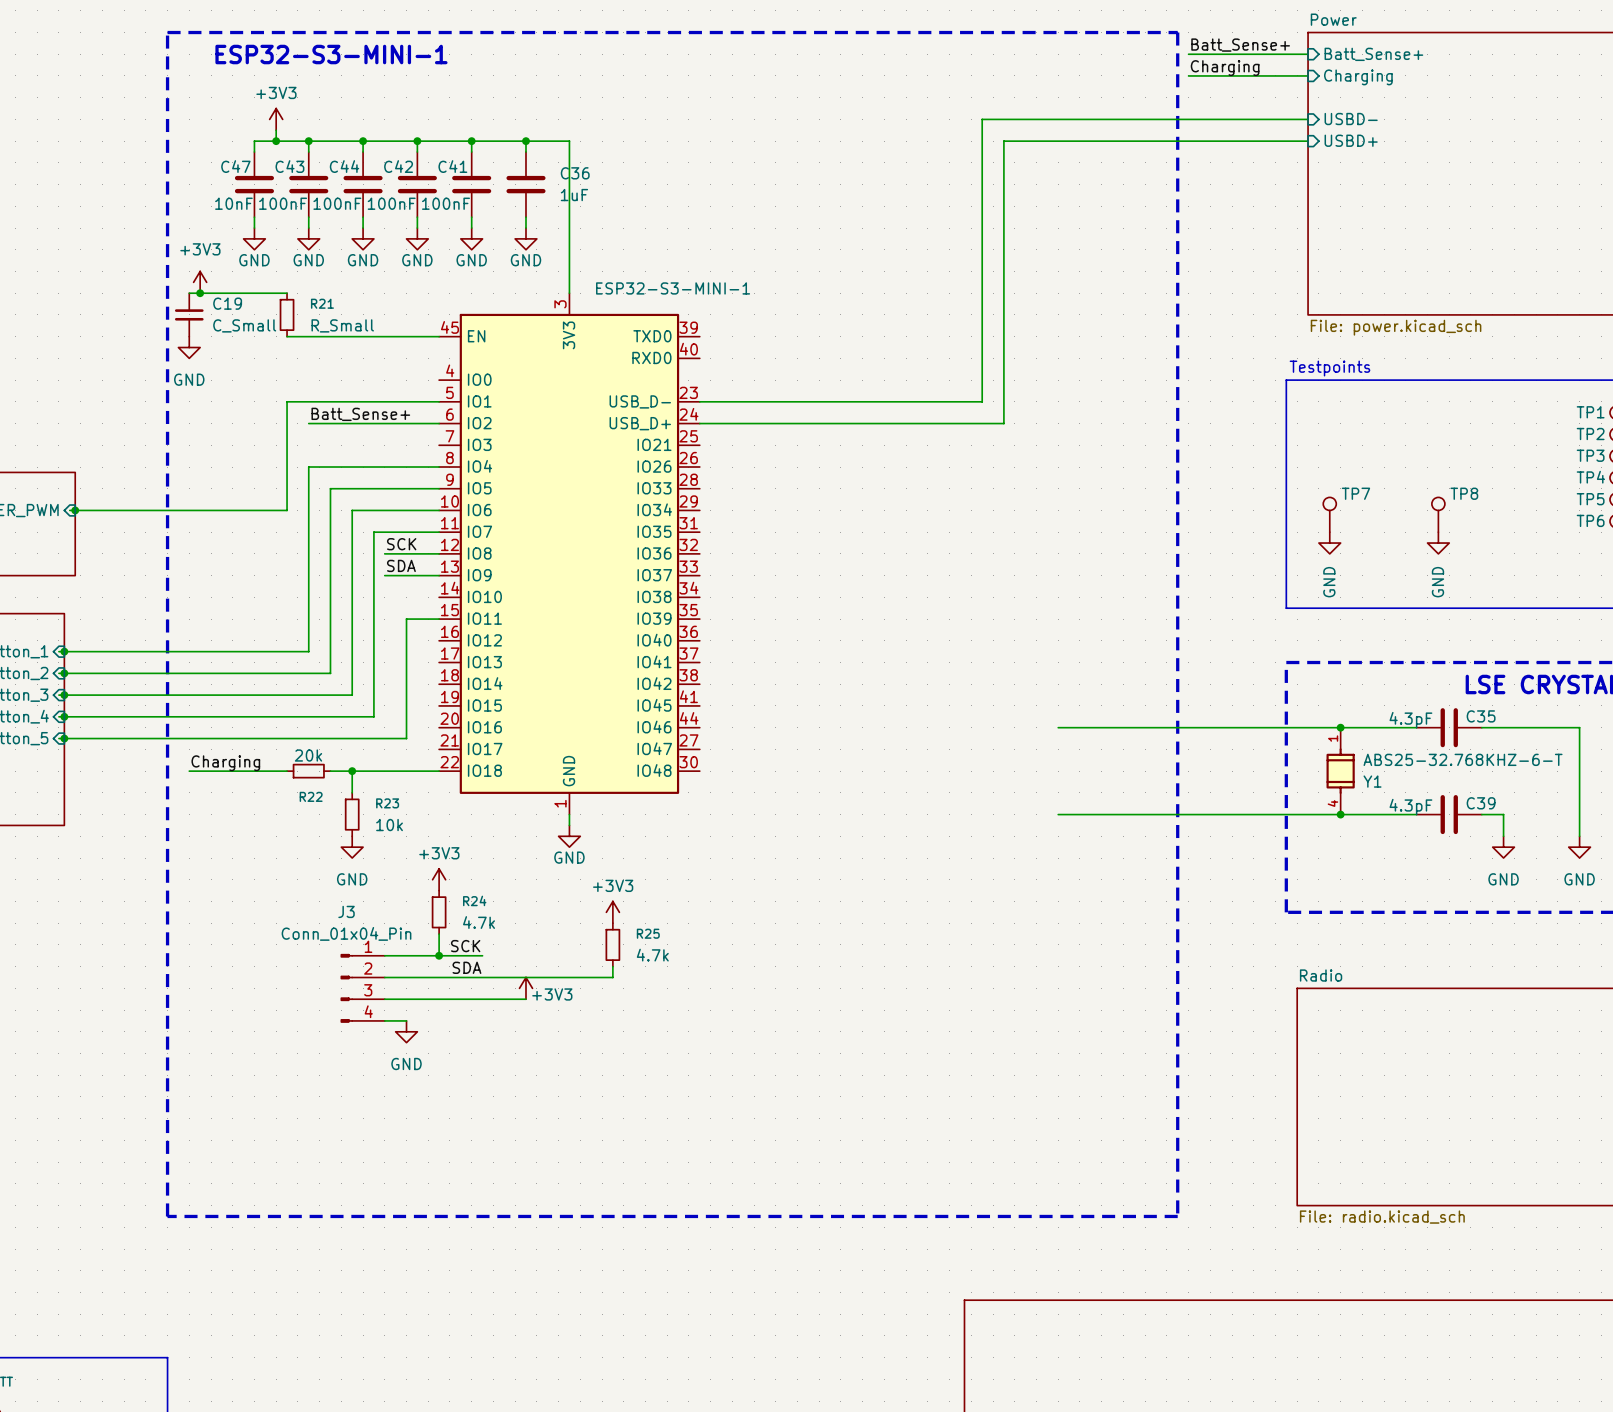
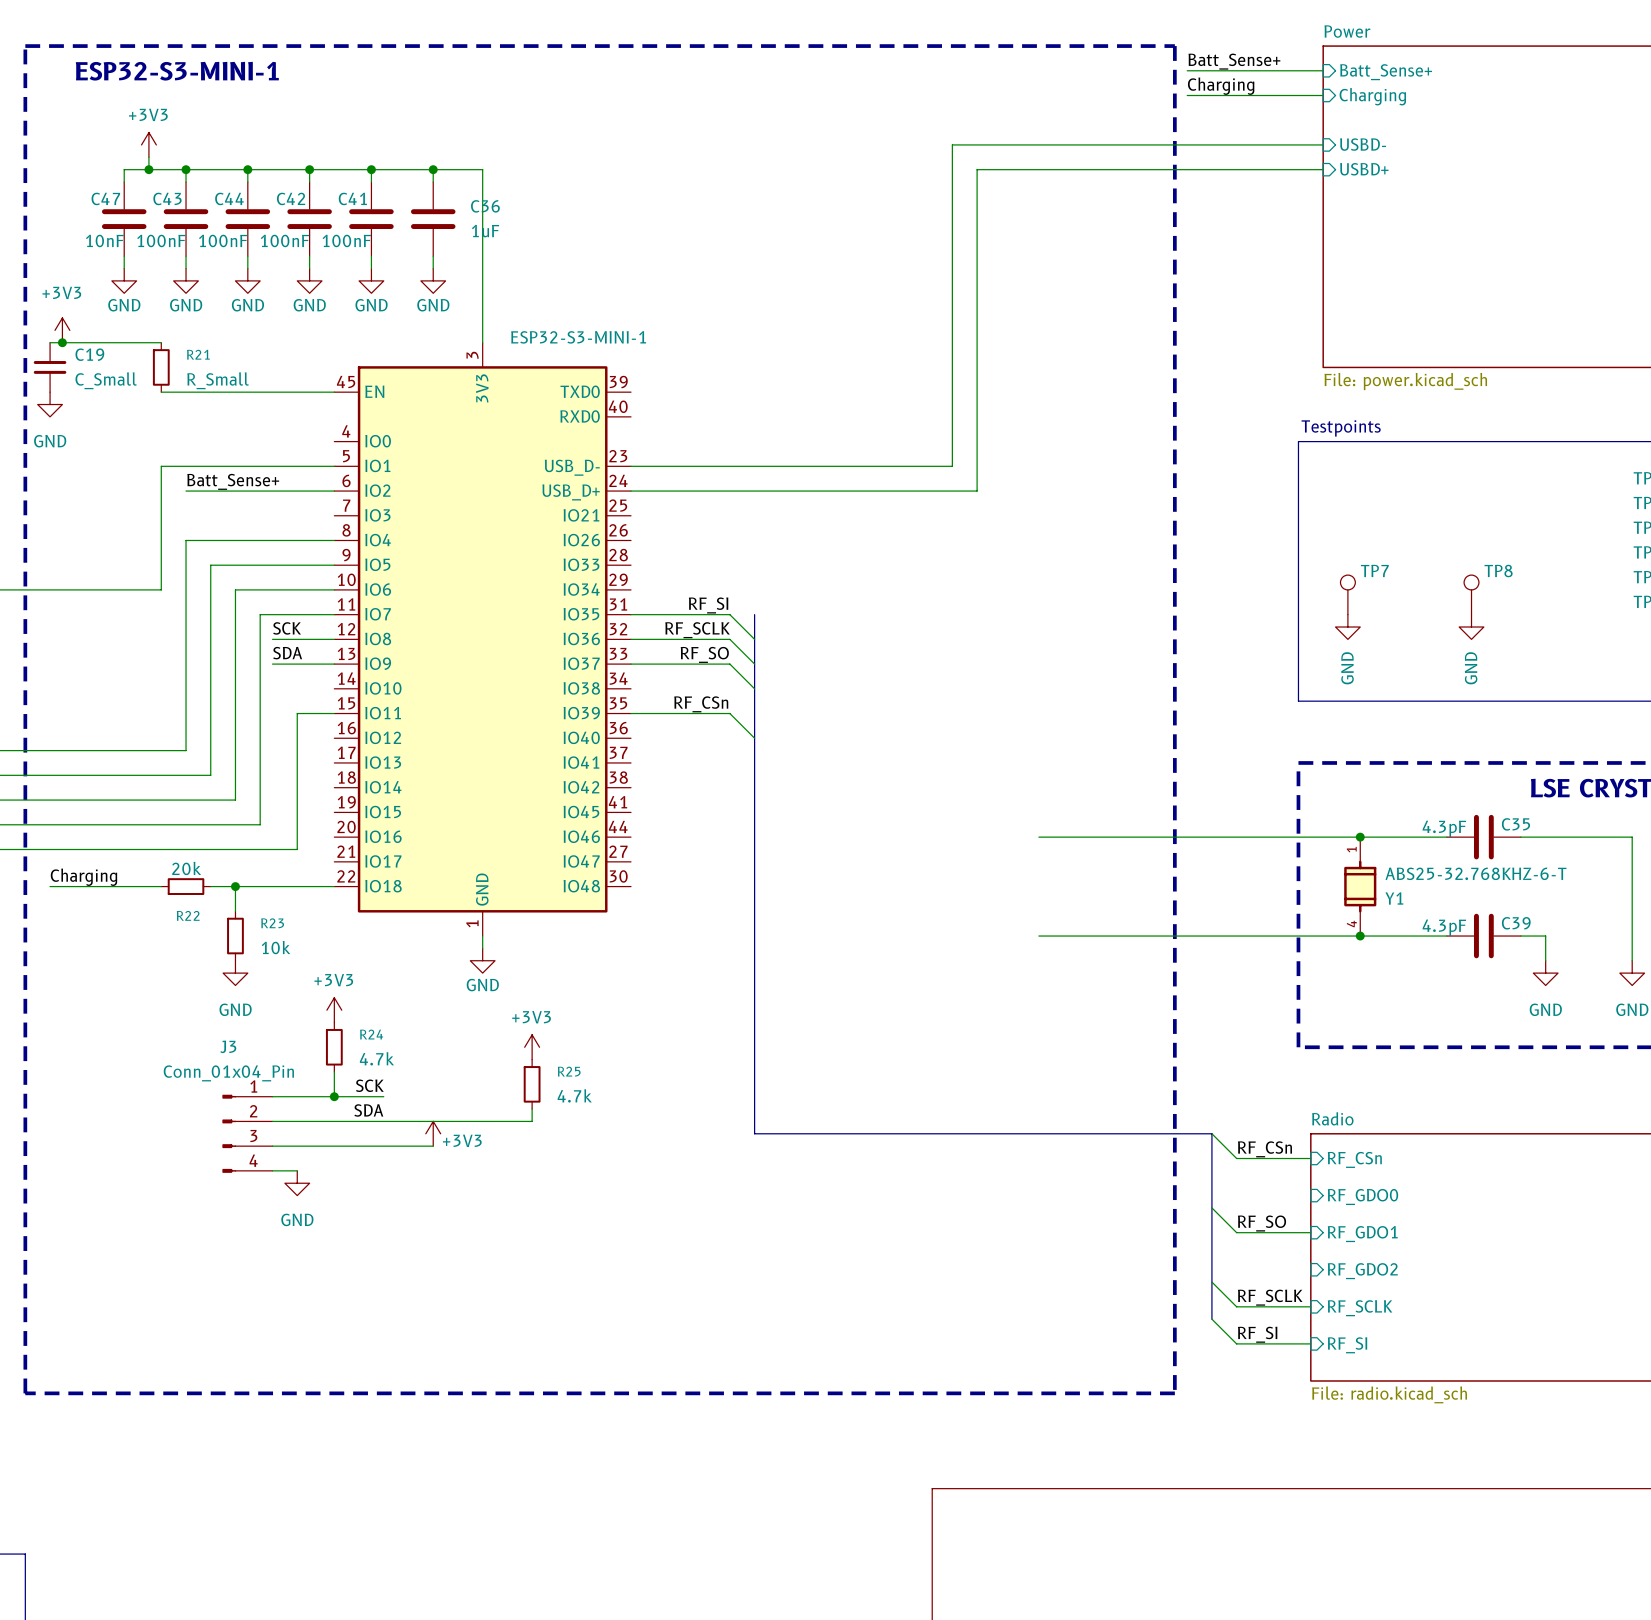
label: none -> RF_SI (708, 605)
wire: none -> (631, 614) (729, 614) (754, 639)
bus: none -> (754, 614) (754, 1133) (1211, 1133) (1211, 1319)
label: none -> RF_SCLK (697, 630)
wire: none -> (631, 639) (729, 639) (754, 664)
label: none -> RF_SO (704, 654)
wire: none -> (631, 664) (729, 664) (754, 688)
label: none -> RF_CSn (701, 704)
wire: none -> (631, 713) (729, 713) (754, 738)
wire: none -> (1211, 1133) (1236, 1158) (1310, 1158)
label: none -> RF_CSn (1264, 1149)
sheet pin: none -> RF_CSn (1354, 1159)
sheet pin: none -> RF_GDO0 (1362, 1196)
wire: none -> (1211, 1207) (1236, 1232) (1310, 1232)
label: none -> RF_SO (1262, 1223)
sheet pin: none -> RF_GDO1 (1362, 1234)
sheet pin: none -> RF_GDO2 (1362, 1271)
wire: none -> (1211, 1282) (1236, 1306) (1310, 1306)
label: none -> RF_SCLK (1270, 1297)
sheet pin: none -> RF_SCLK (1360, 1308)
wire: none -> (1211, 1319) (1236, 1343) (1310, 1343)
label: none -> RF_SI (1257, 1334)
sheet pin: none -> RF_SI (1347, 1345)

